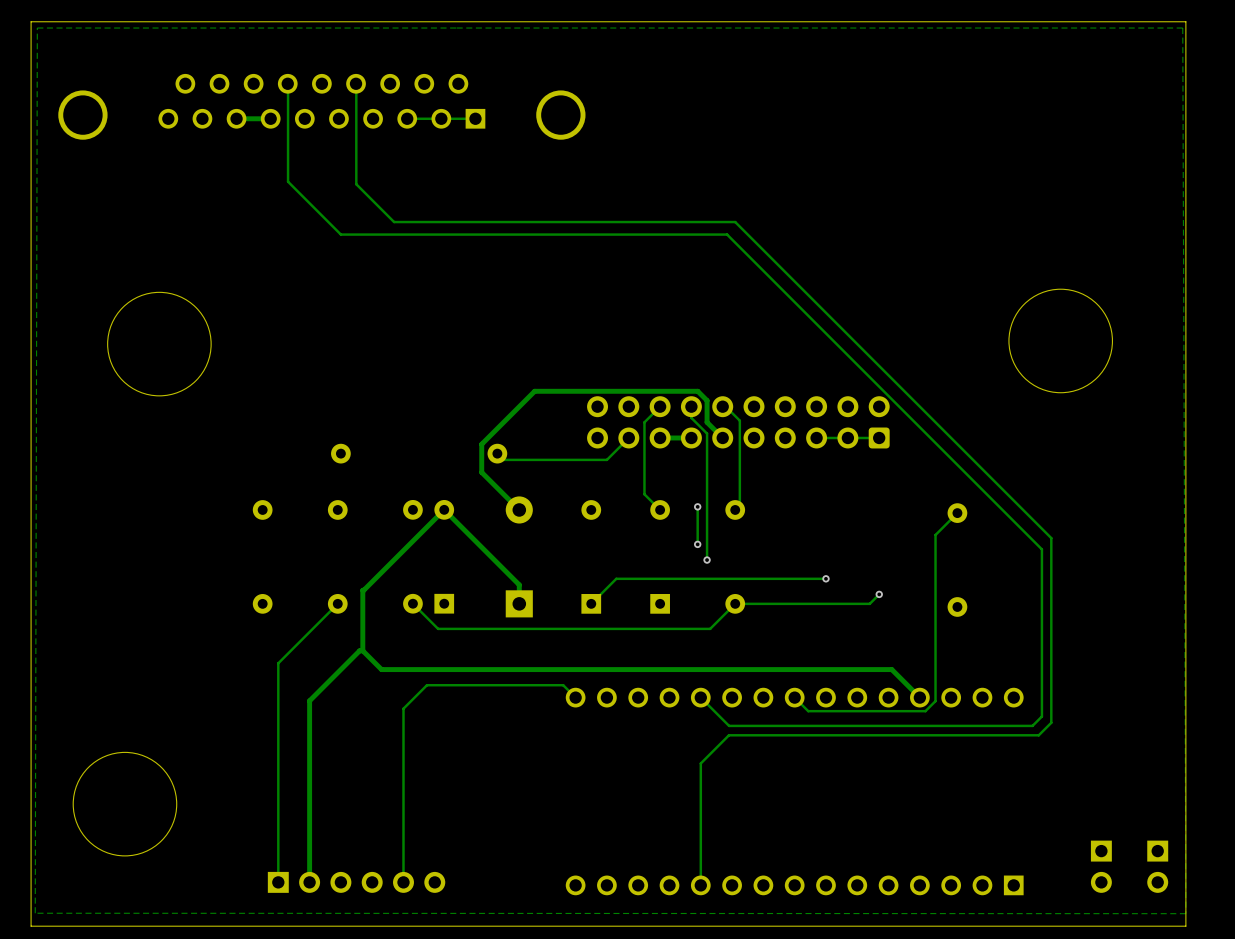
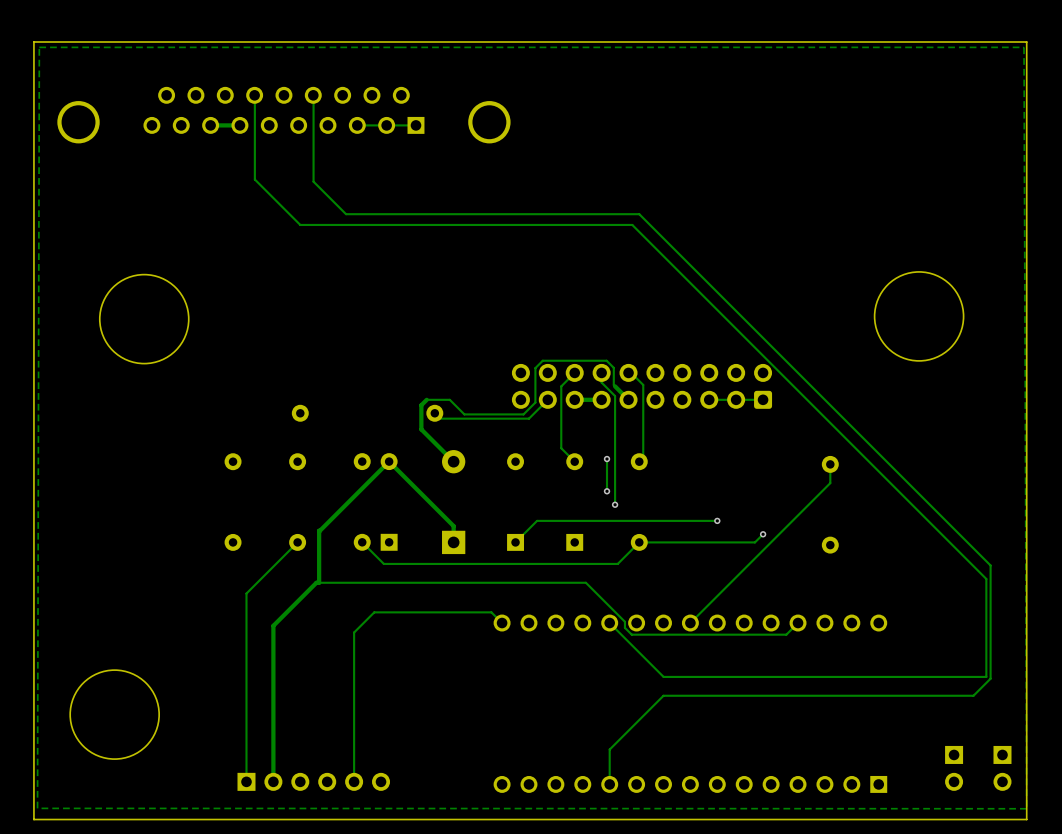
track: (707, 422) (707, 400) (697, 391) (534, 391) (487, 437) -> (615, 386) (613, 367) (606, 360) (542, 360) (535, 368) (535, 402) (523, 414) (464, 414) (449, 399) (426, 399)
track: (957, 513) (935, 535) (935, 701) (925, 711) (906, 711) -> (830, 464) (830, 483) (690, 623)
track: (1051, 538) (1051, 722) (1038, 735) (728, 735) (700, 763) (700, 844) -> (911, 485) (990, 565) (990, 678) (973, 695) (663, 695) (609, 749)
track: (1041, 549) (1041, 716) (1032, 725) (729, 725) -> (902, 495) (986, 579) (986, 676) (663, 676) (634, 647)
track: (362, 650) (381, 669) (891, 669) (919, 697) -> (319, 582) (585, 582) (624, 621) (624, 627) (631, 634) (702, 634)
track: (794, 697) (808, 711) -> none
track: none -> (798, 623) (786, 634)

